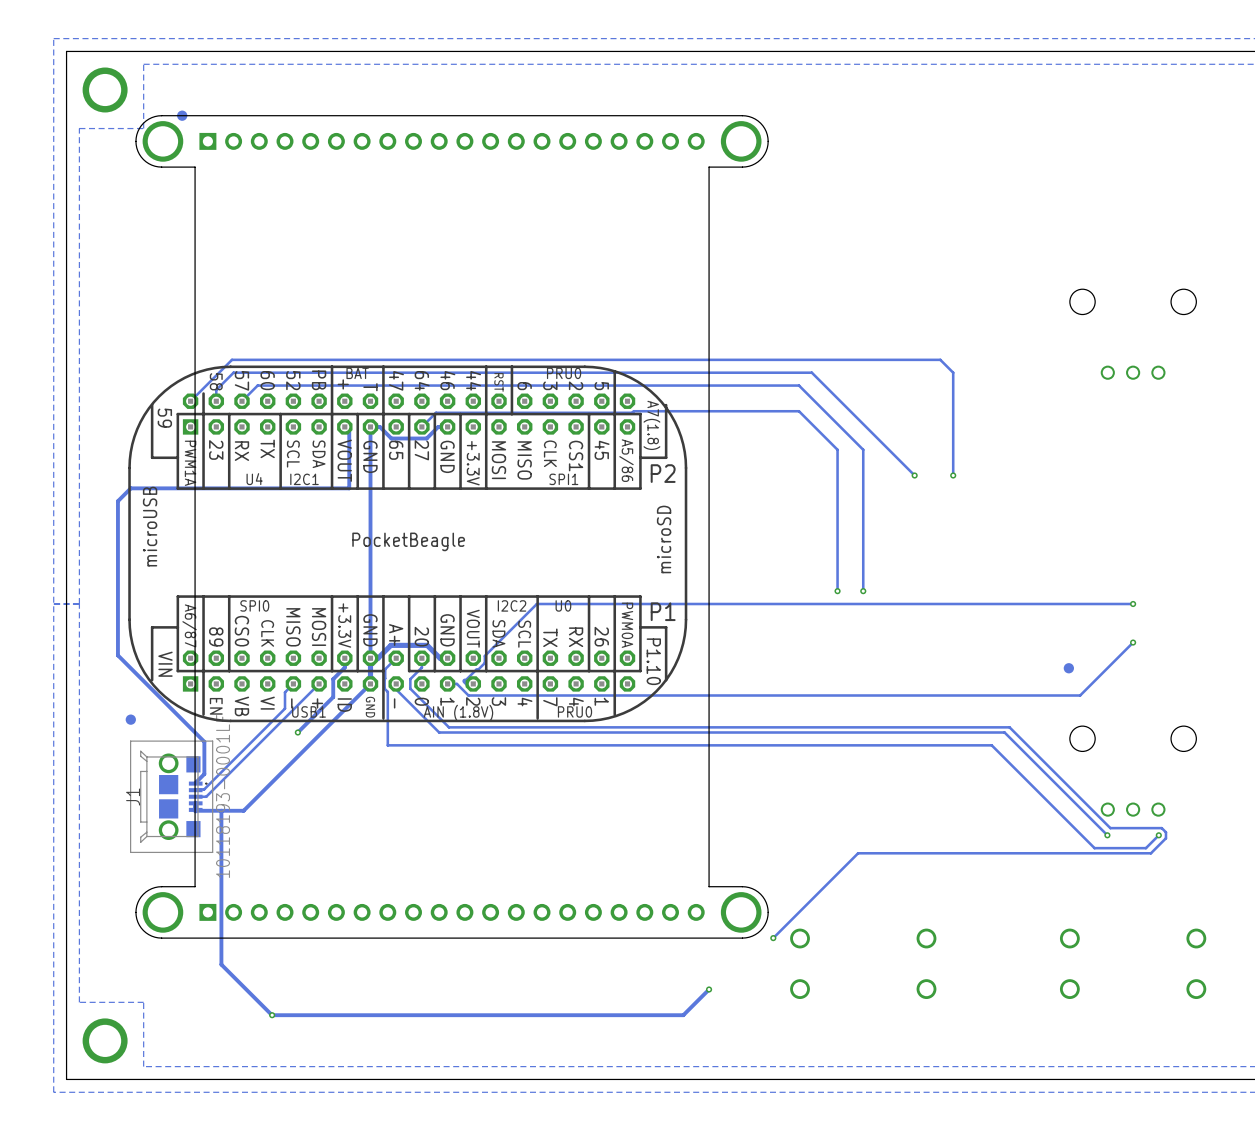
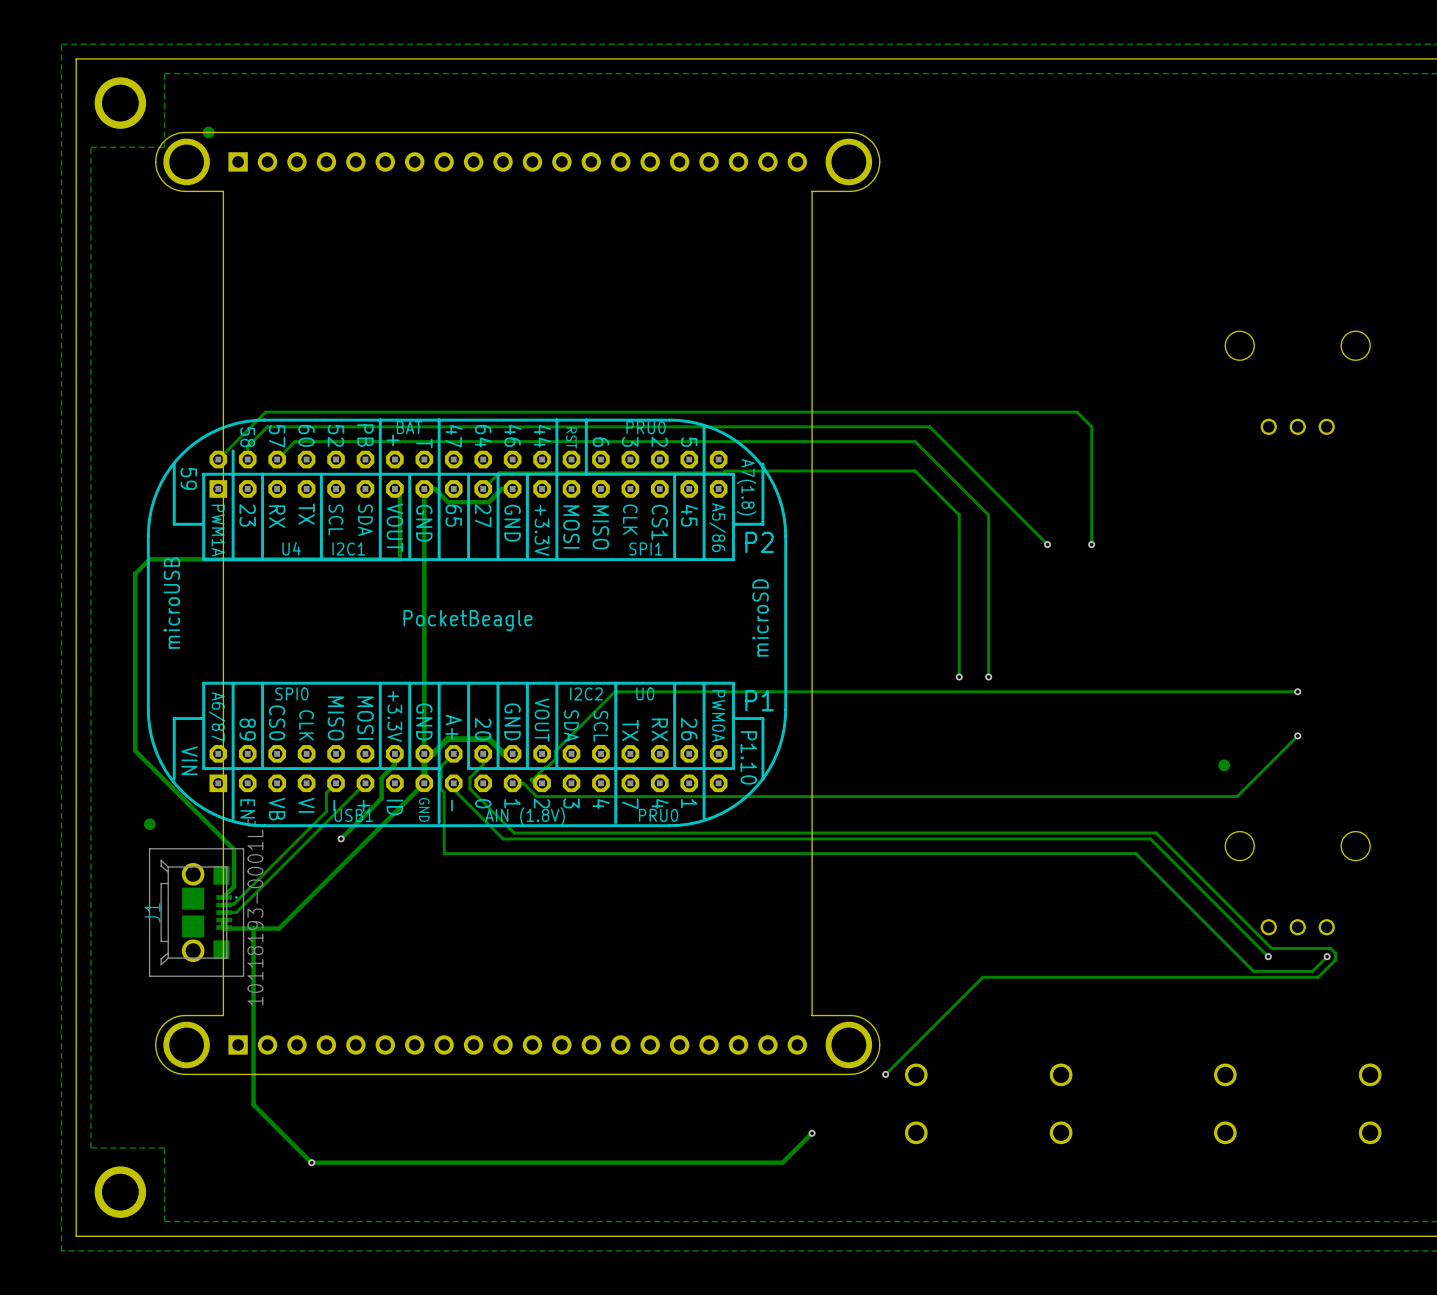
zone outline: (79, 604) (53, 604) -> none

